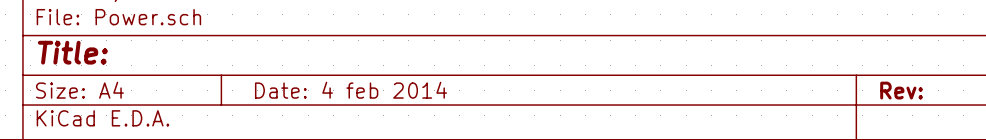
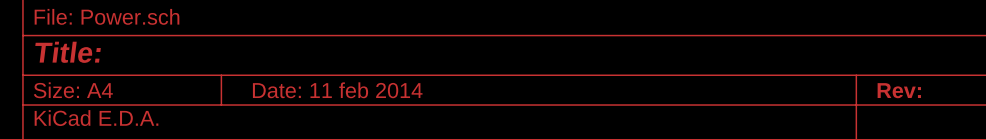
title block: Date: 4 feb 2014 (351, 90) -> Date: 11 feb 2014 (337, 90)

